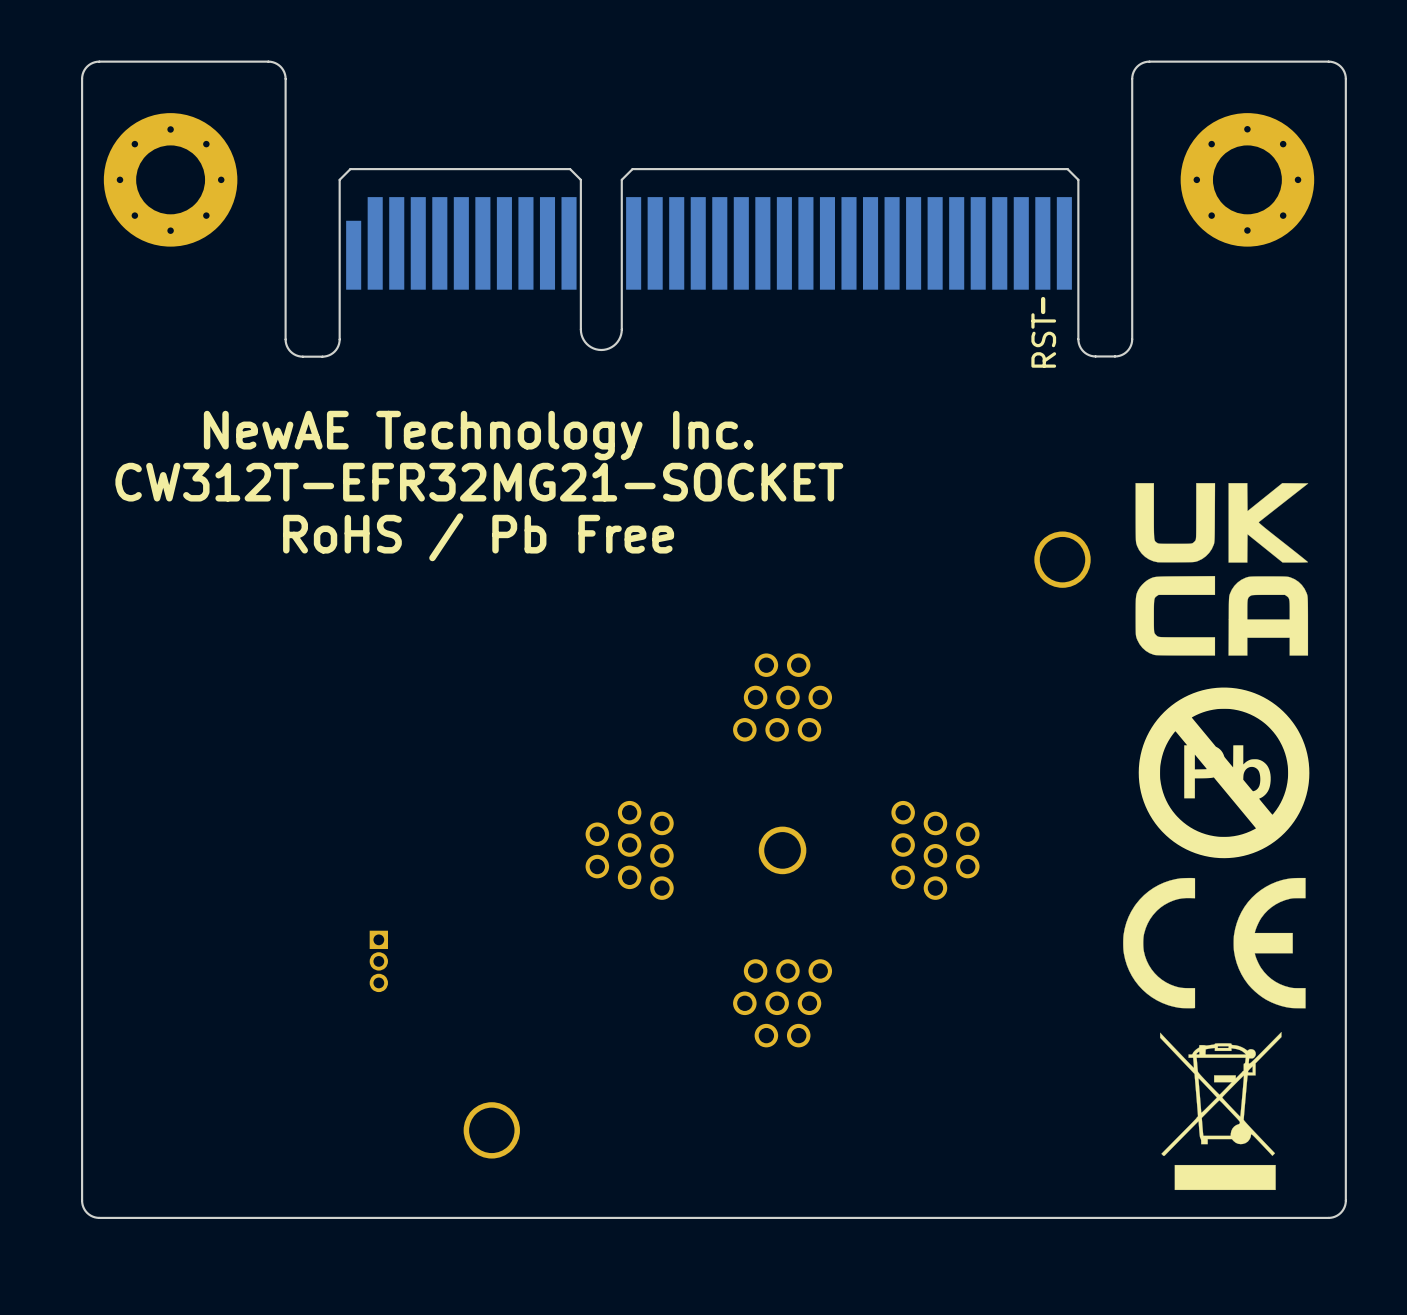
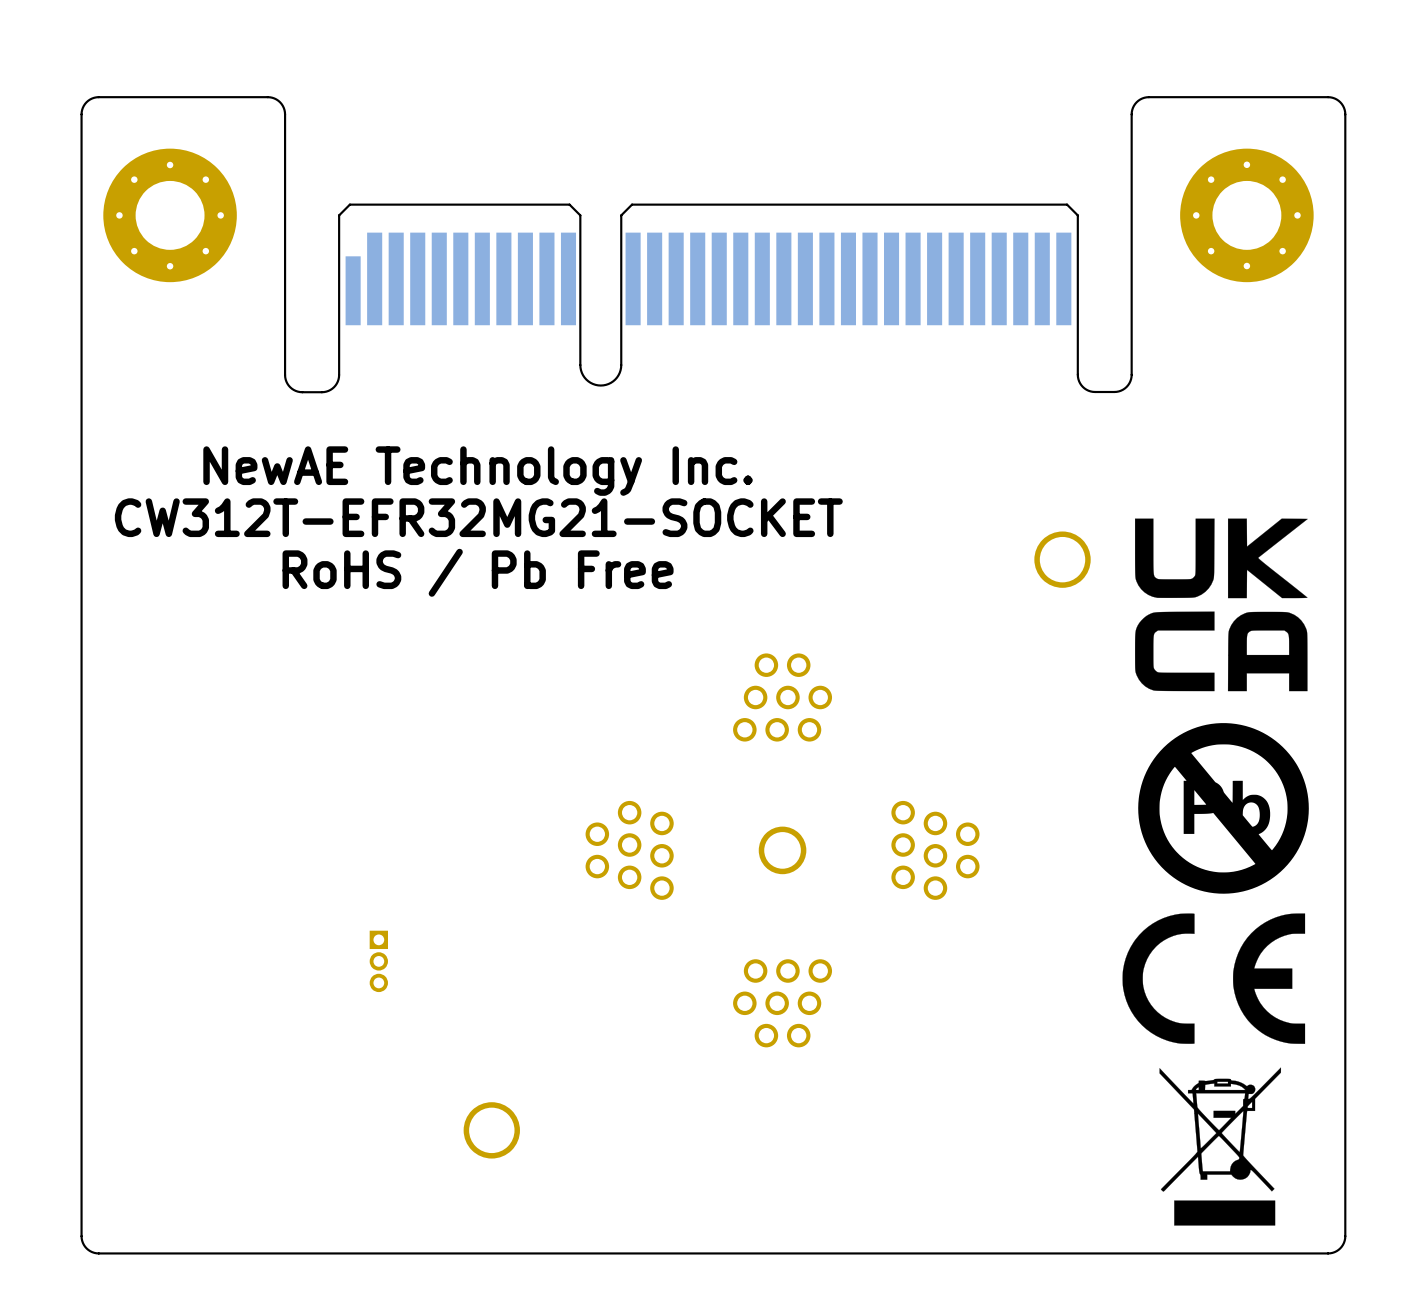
line: (1043, 299) (1043, 311) -> none
text: RST (1043, 340) -> none
text position: NewAE Technology Inc. (478, 435) -> NewAE Technology Inc. (478, 471)
text position: CW312T-EFR32MG21-SOCKET (479, 482) -> CW312T-EFR32MG21-SOCKET (478, 517)
text position: RoHS / Pb Free (478, 537) -> RoHS / Pb Free (478, 572)
drawing position: (1221, 569) -> (1221, 604)
part position: (713, 639) -> (713, 675)
drawing position: (1224, 772) -> (1223, 808)
drawing position: (1214, 943) -> (1213, 978)
drawing position: (1220, 1110) -> (1220, 1146)

